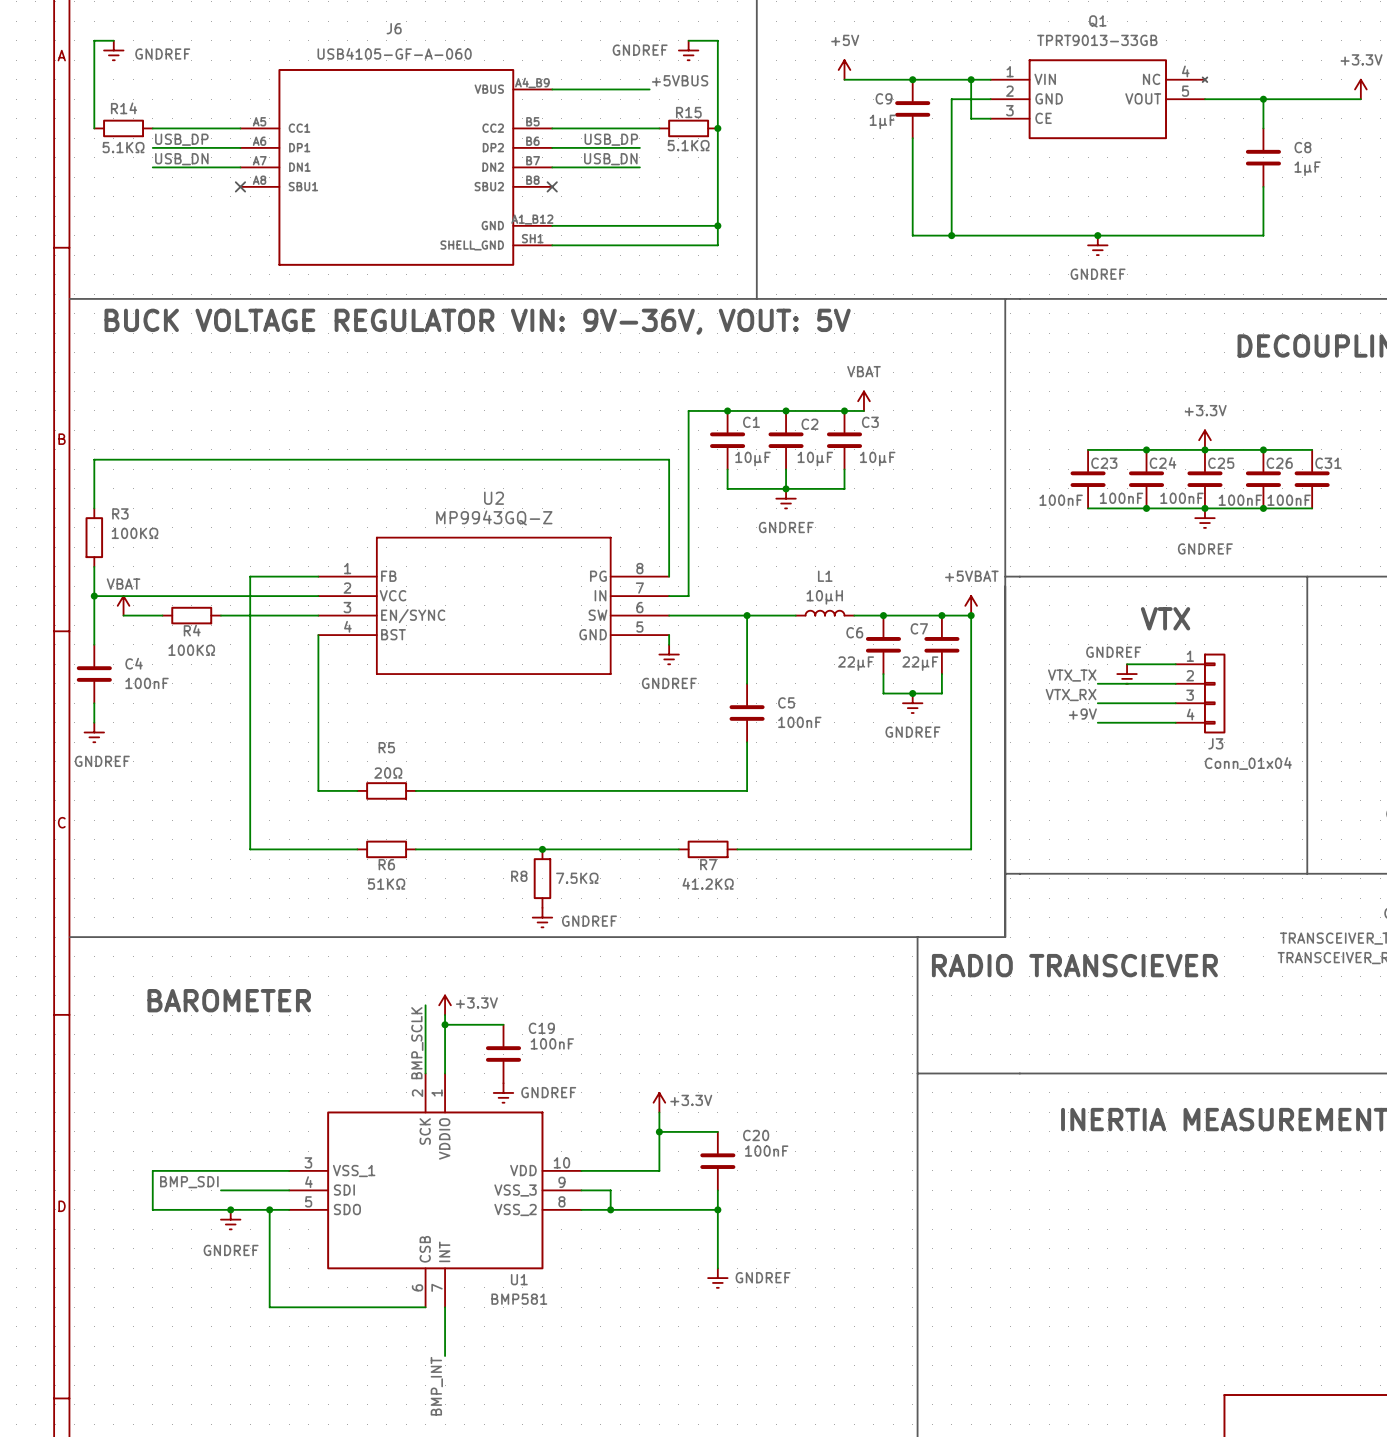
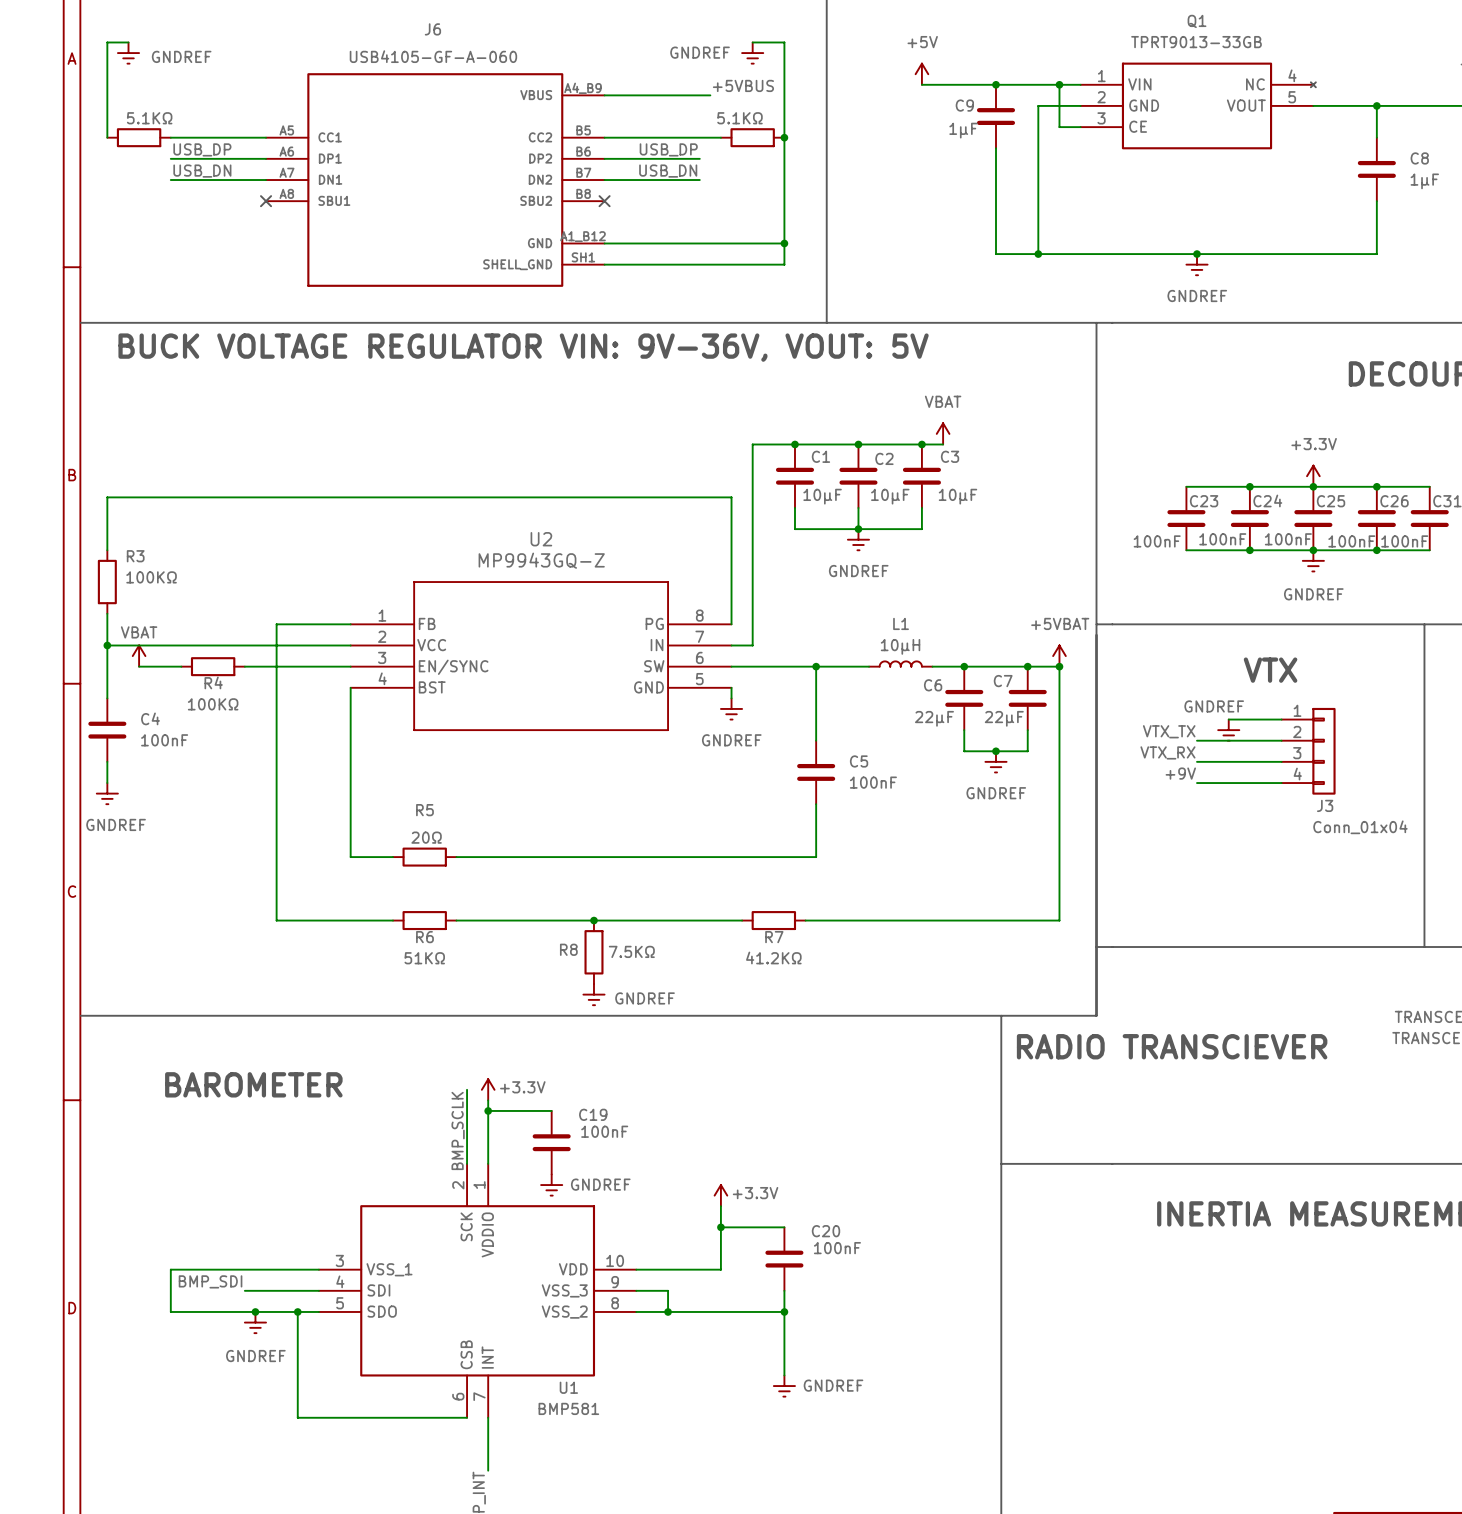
R14 name: R14 (124, 108) -> none
R15 name: R15 (688, 112) -> none
R15 value position: 5.1KΩ (688, 145) -> 5.1KΩ (739, 118)
R14 value position: 5.1KΩ (123, 147) -> 5.1KΩ (149, 118)

